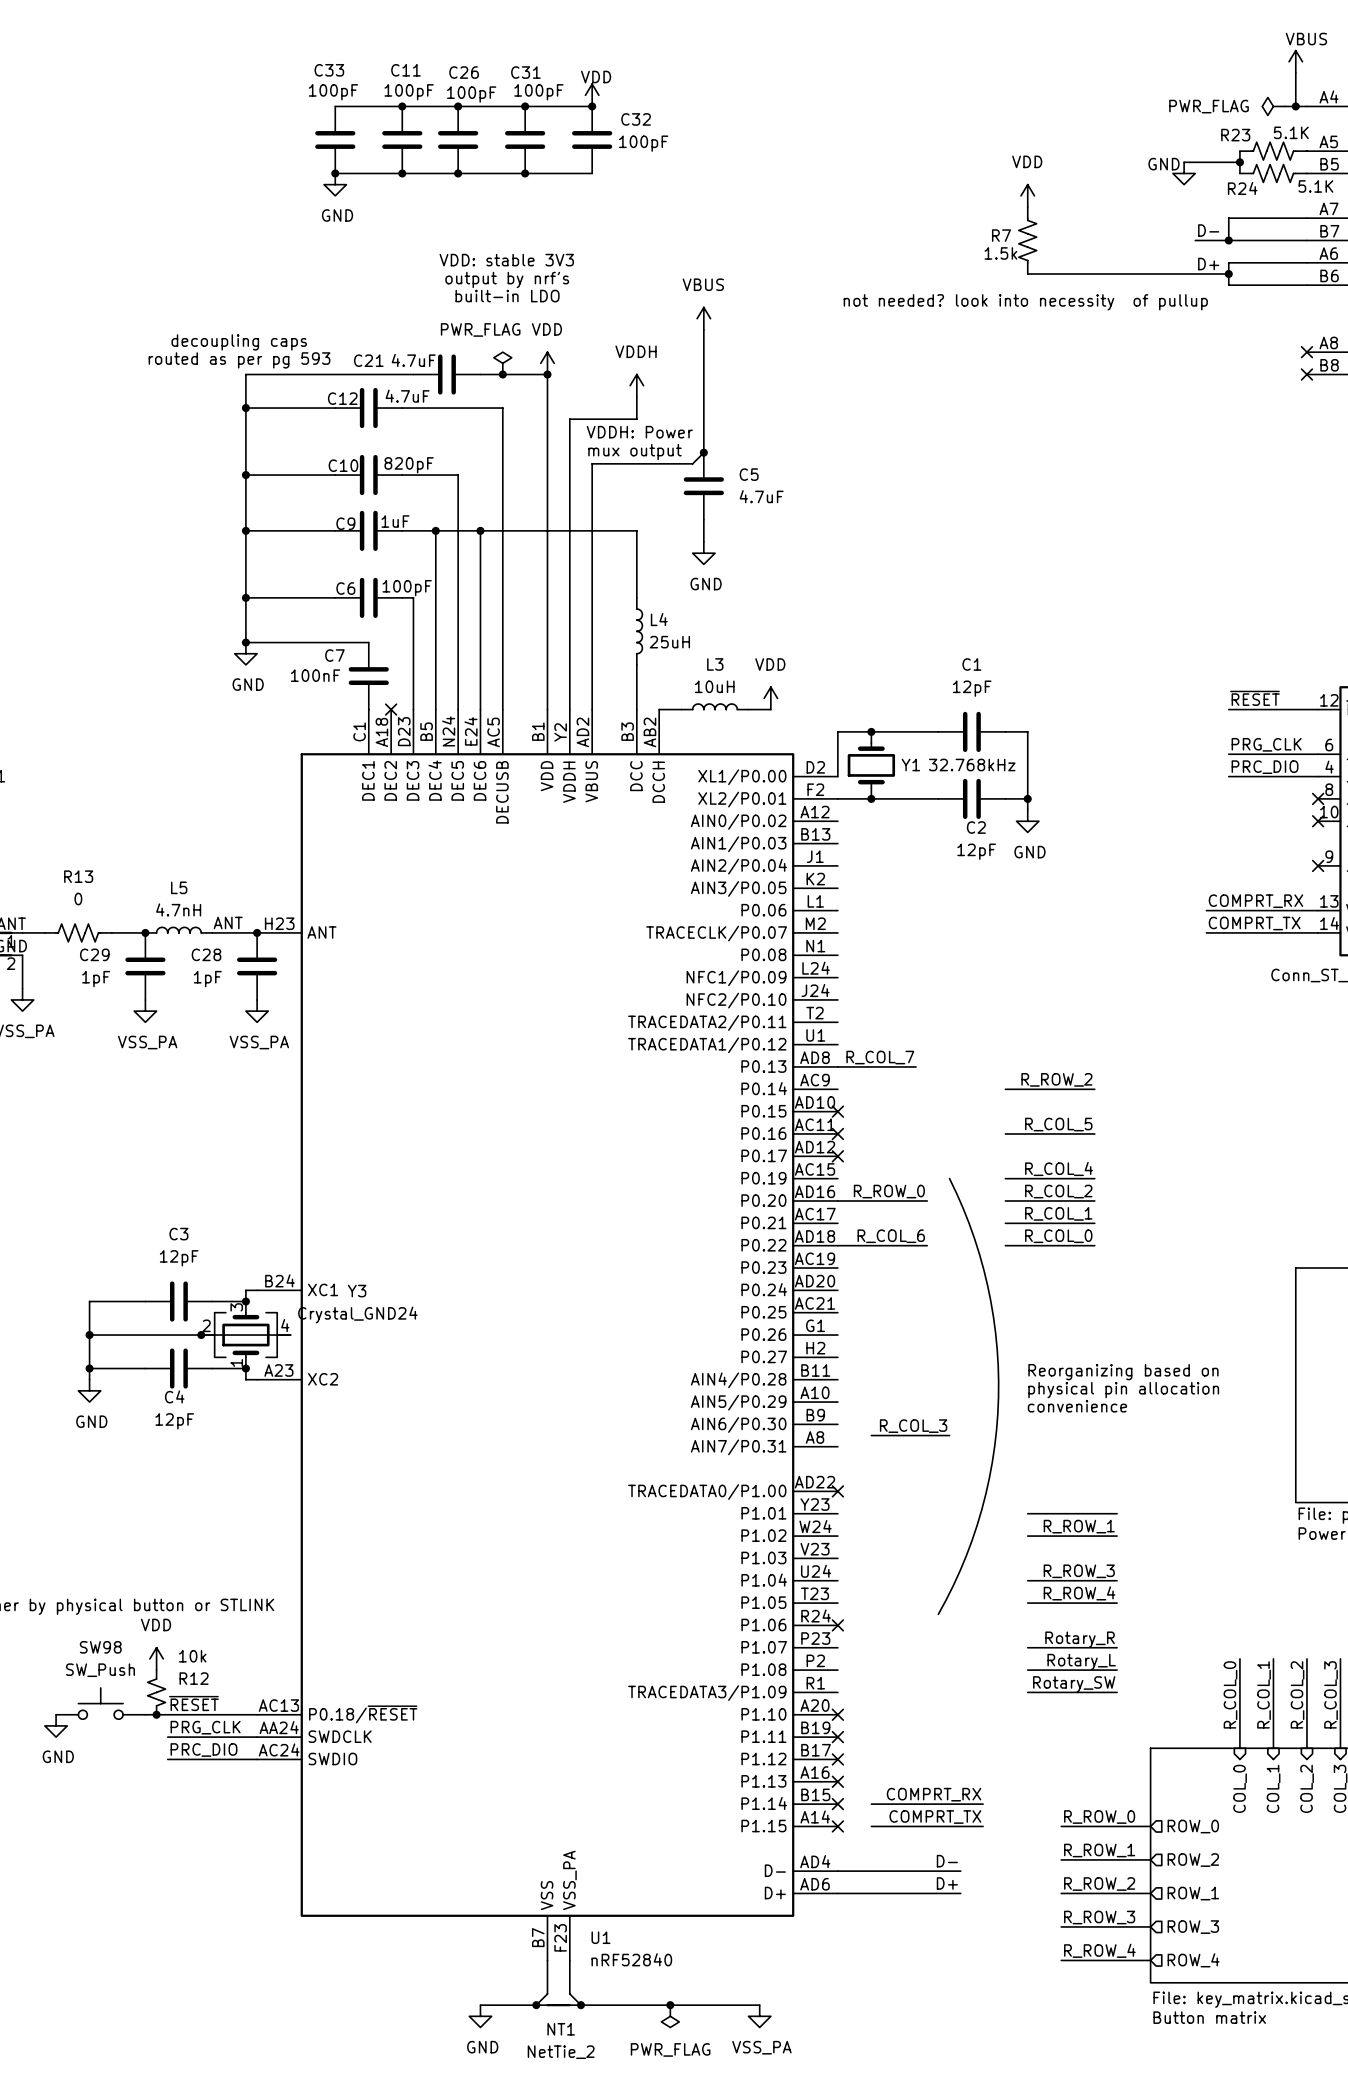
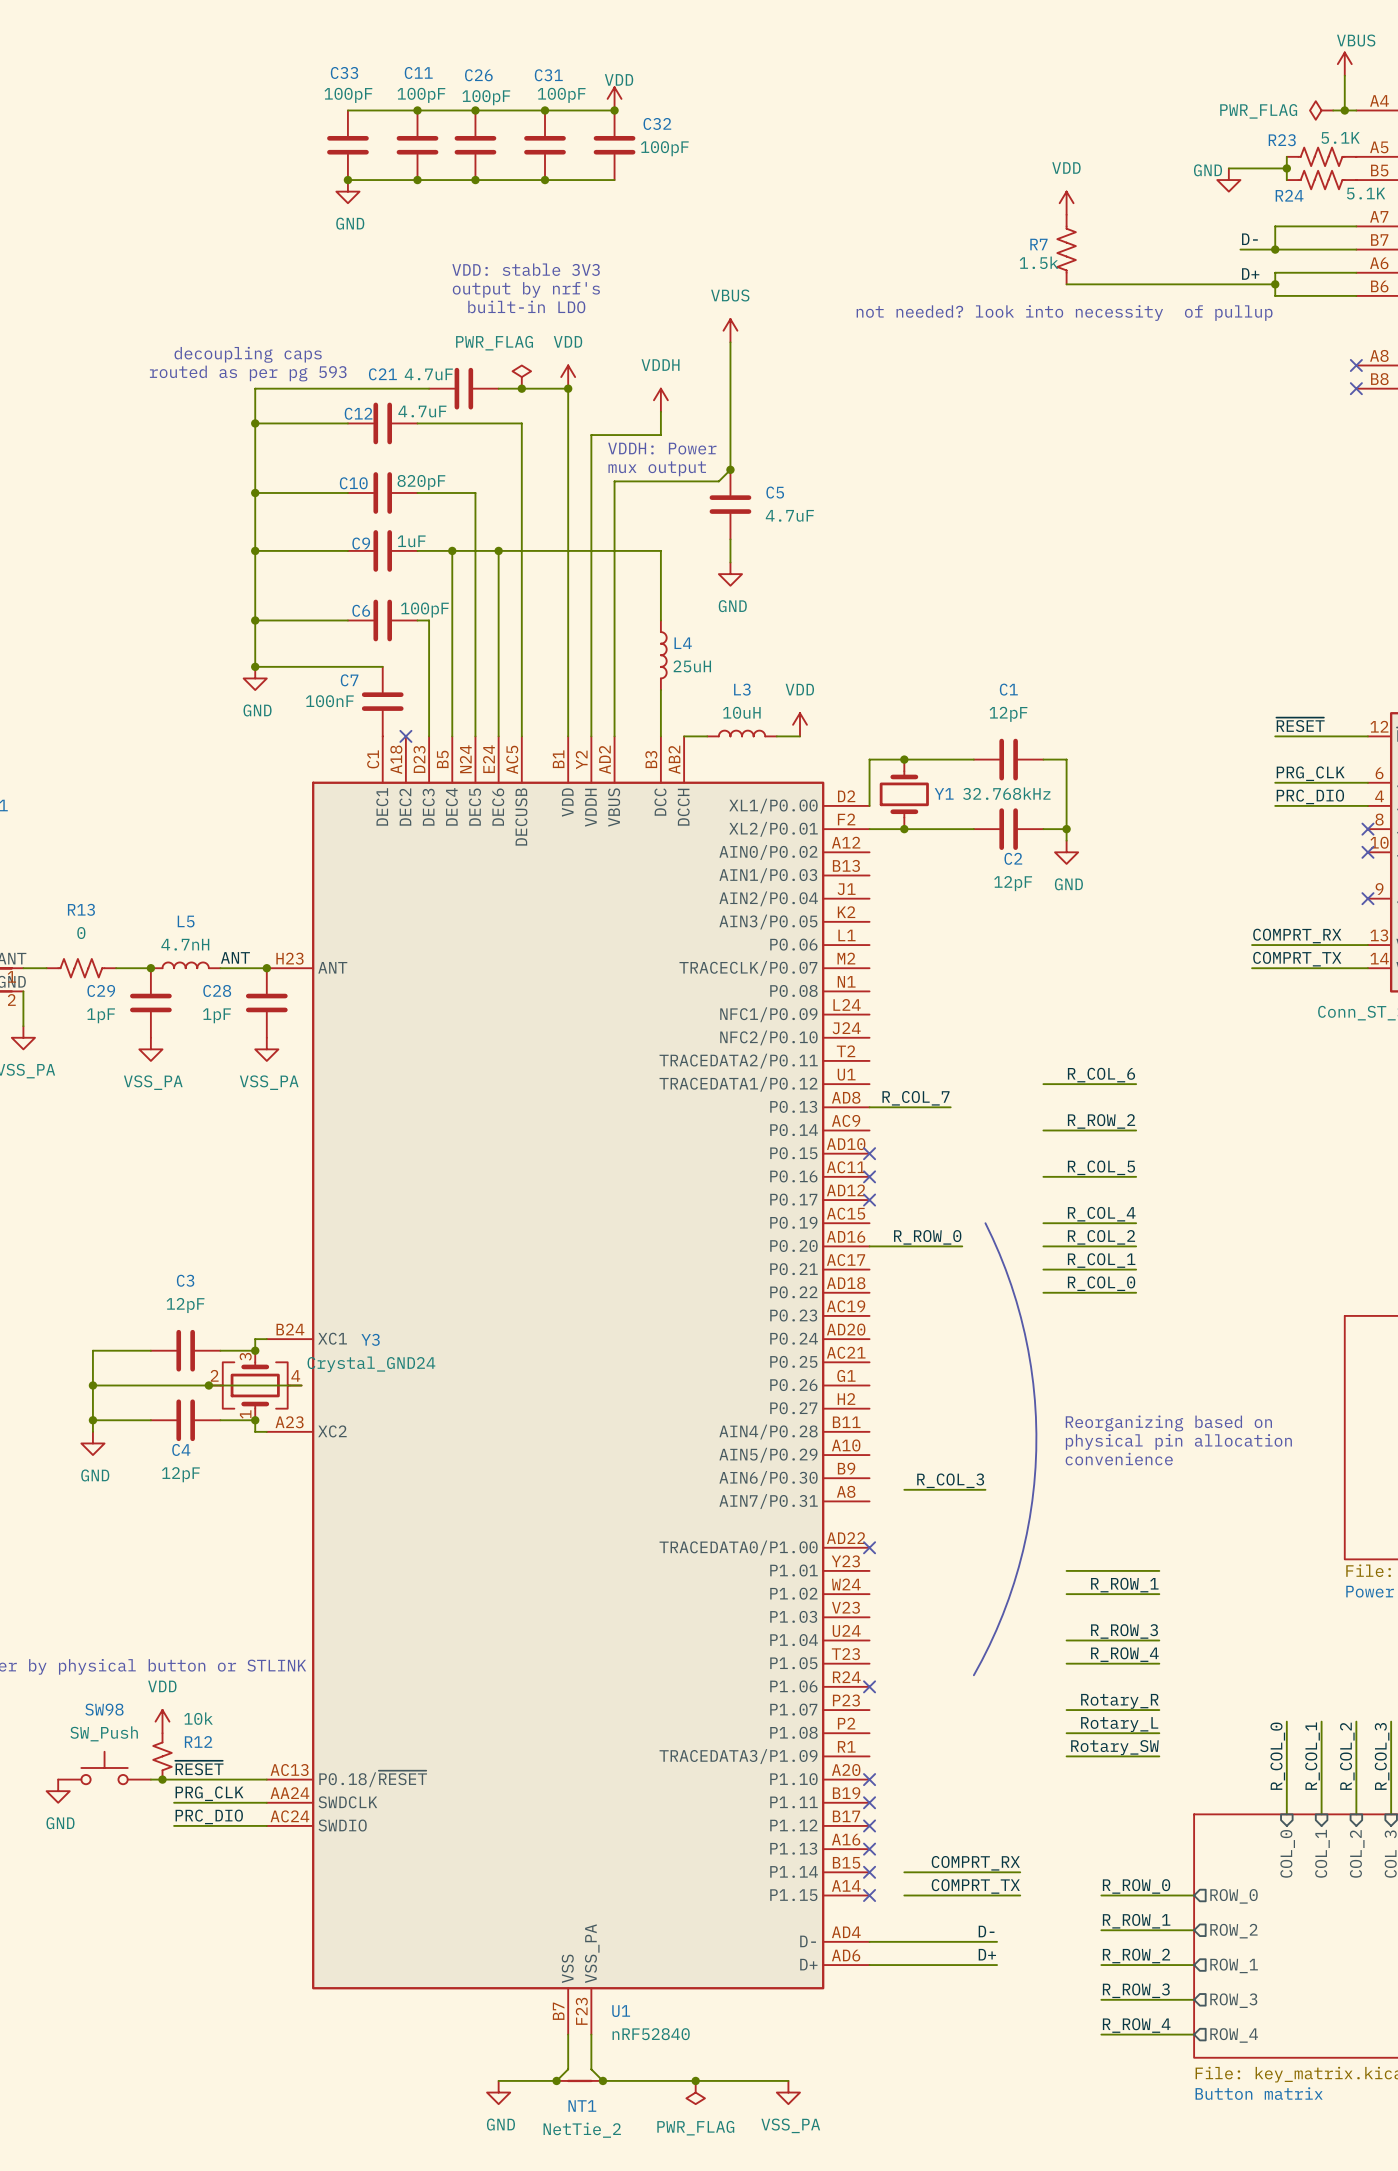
label: none -> R_COL_6 (1101, 1075)
wire: none -> (1043, 1084) (1136, 1084)
label: R_COL_6 (891, 1236) -> none
wire: (837, 1245) (927, 1245) -> none

